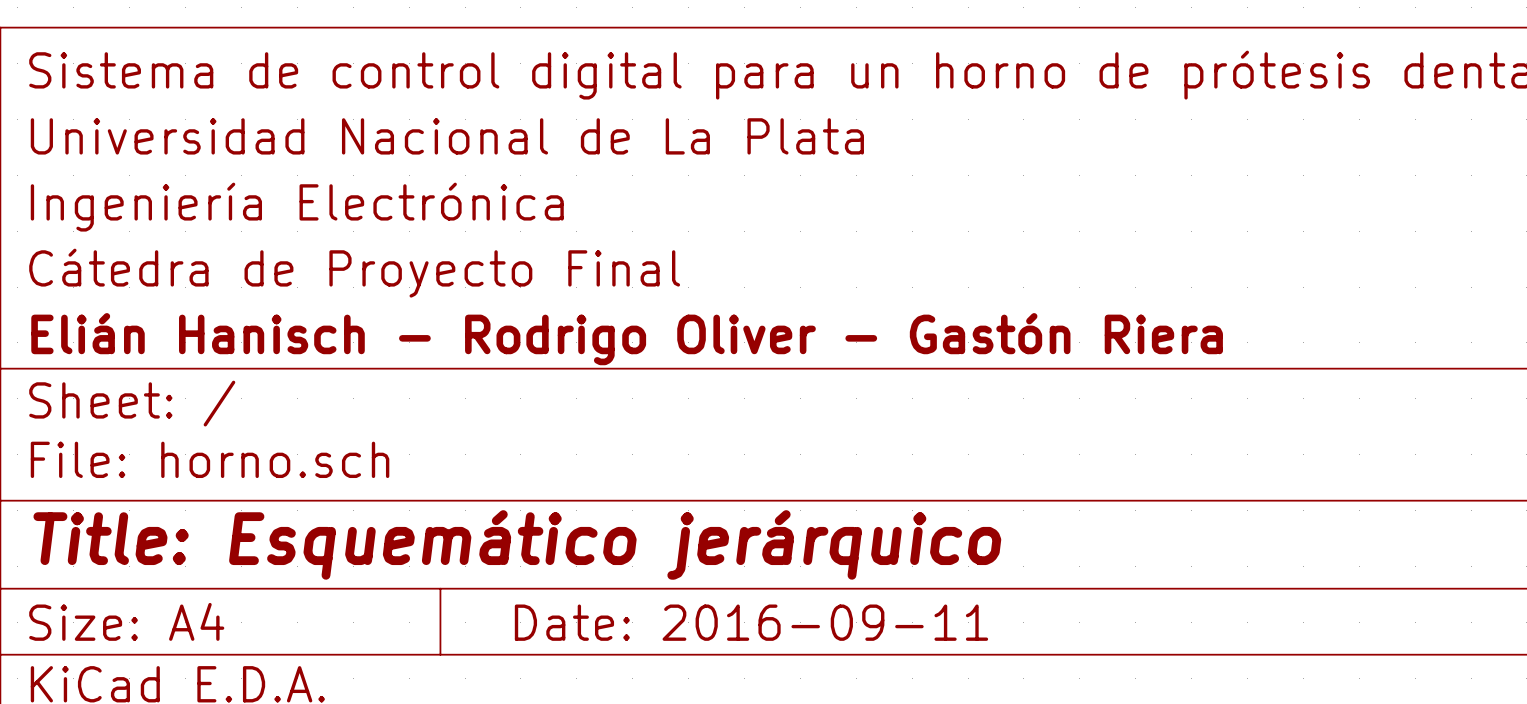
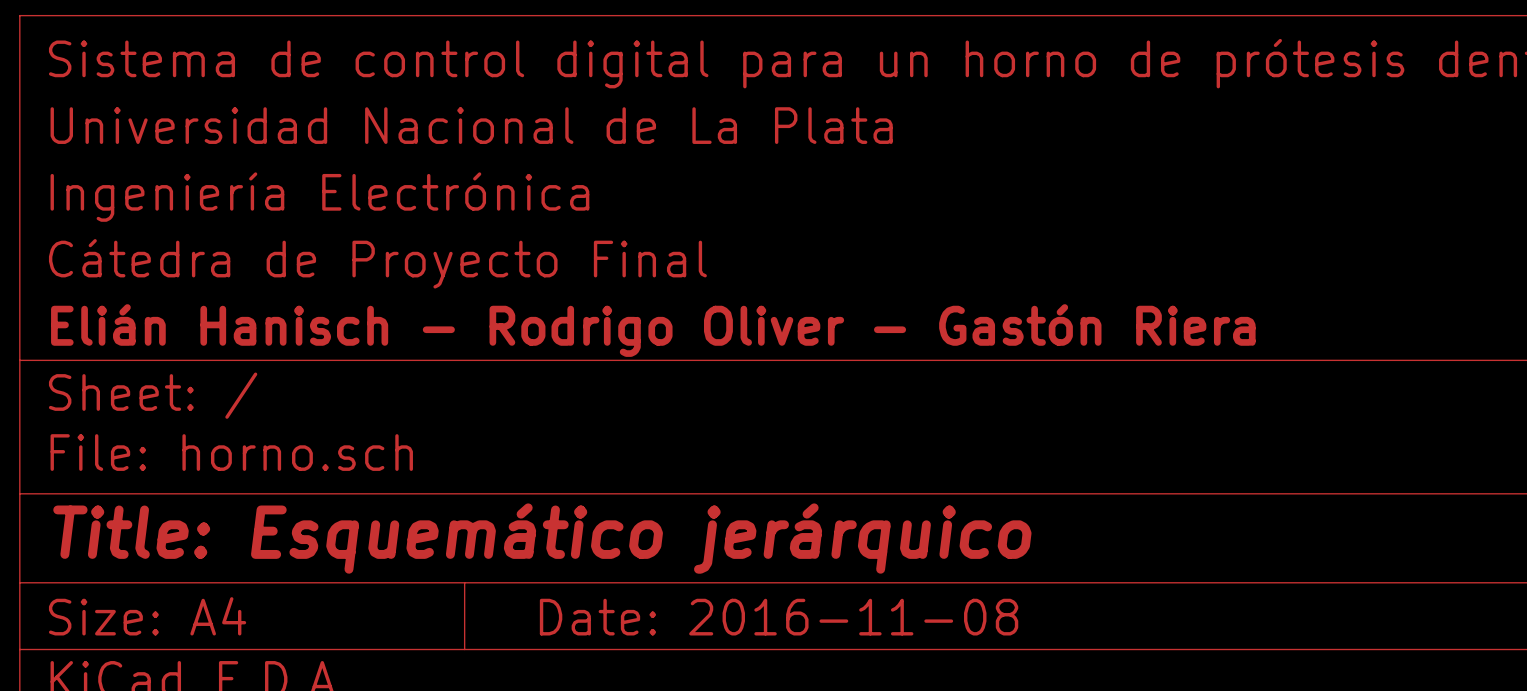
title block: Date: 2016-09-11 (751, 622) -> Date: 2016-11-08 (779, 617)

